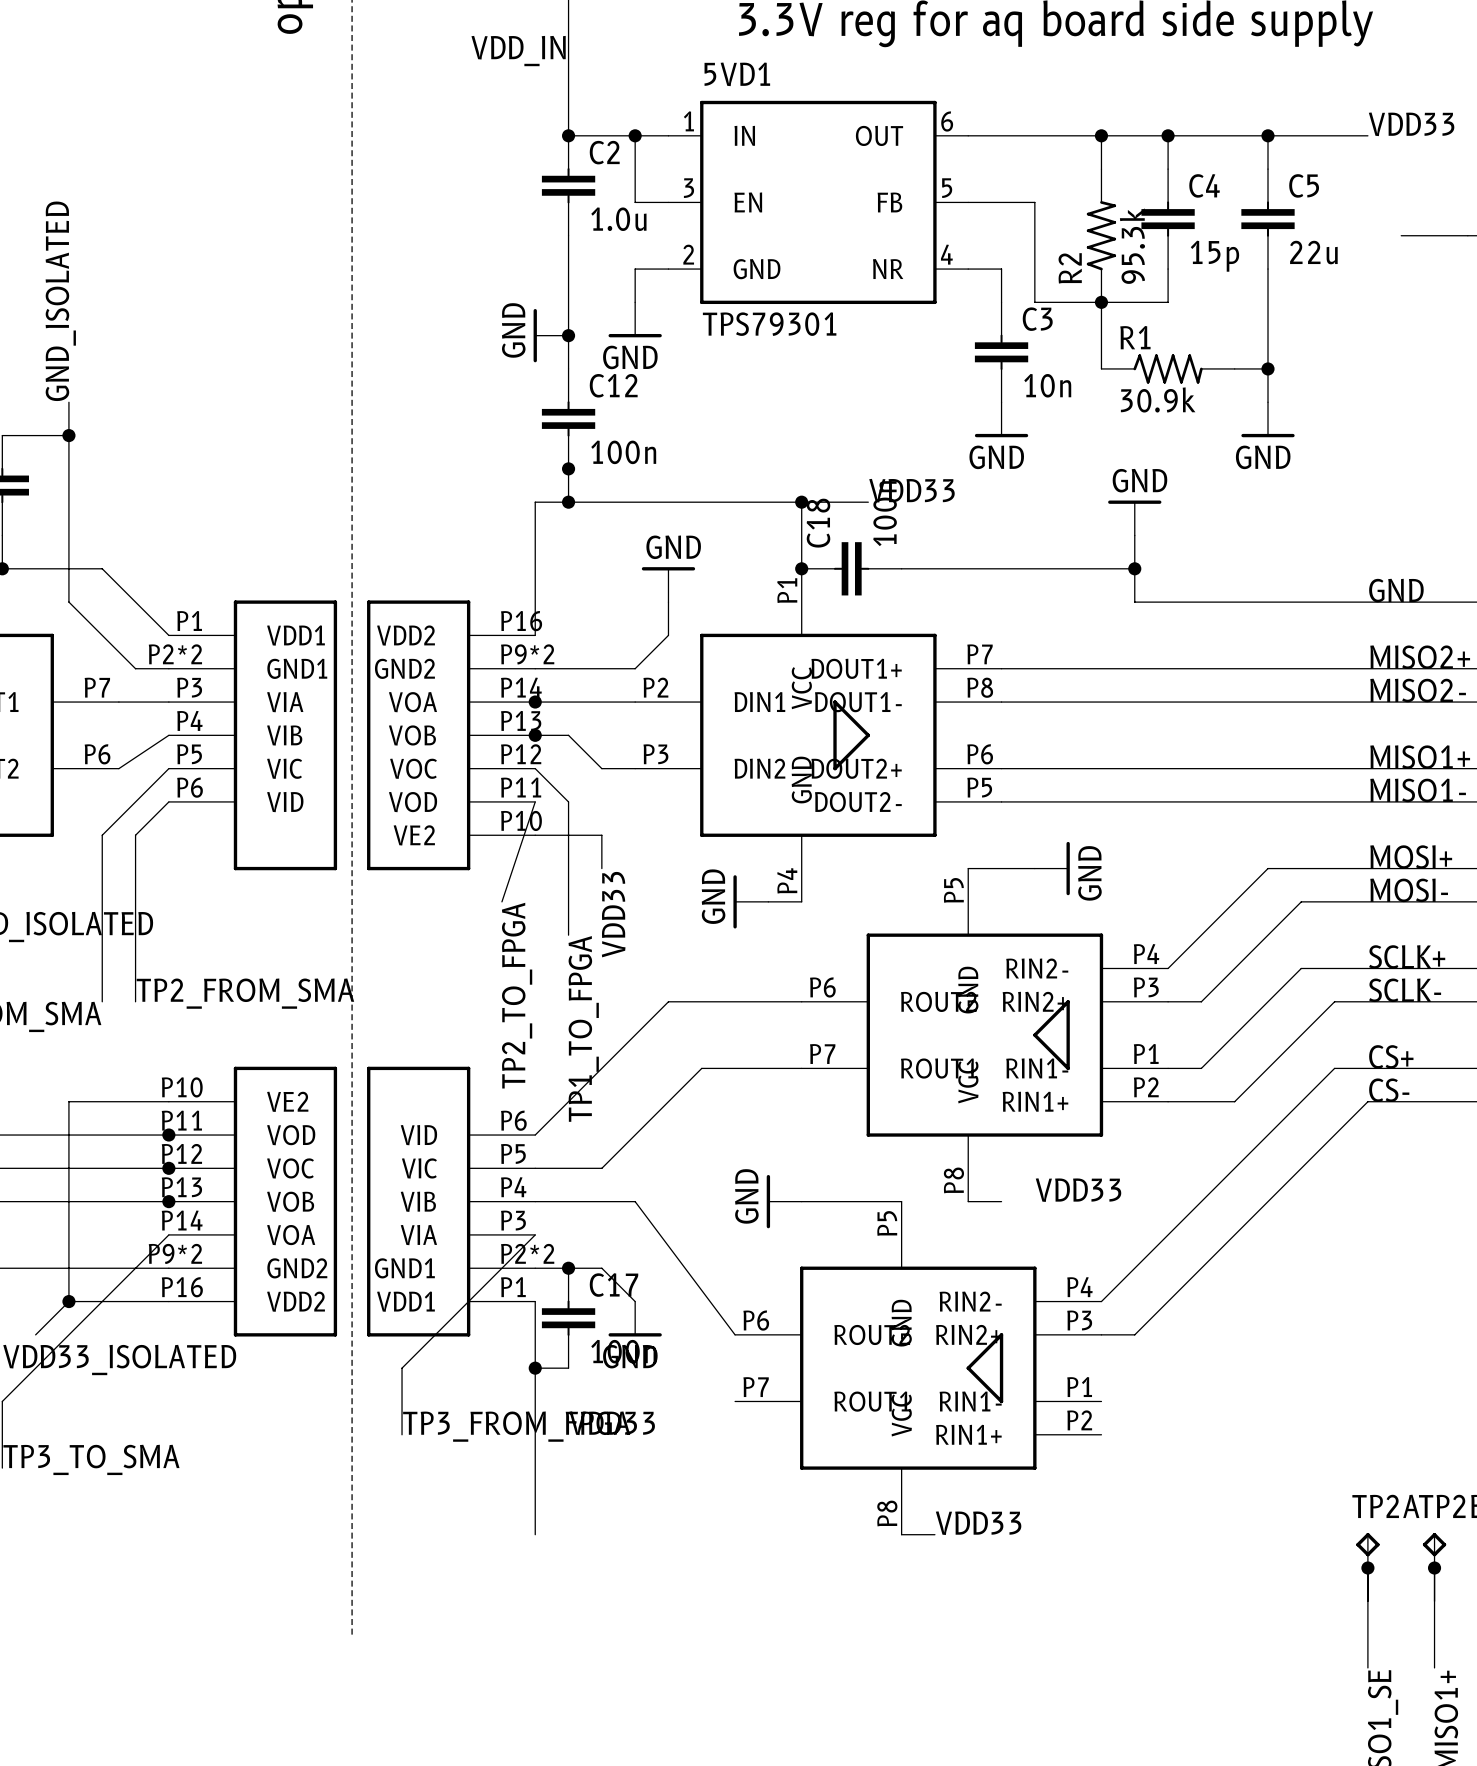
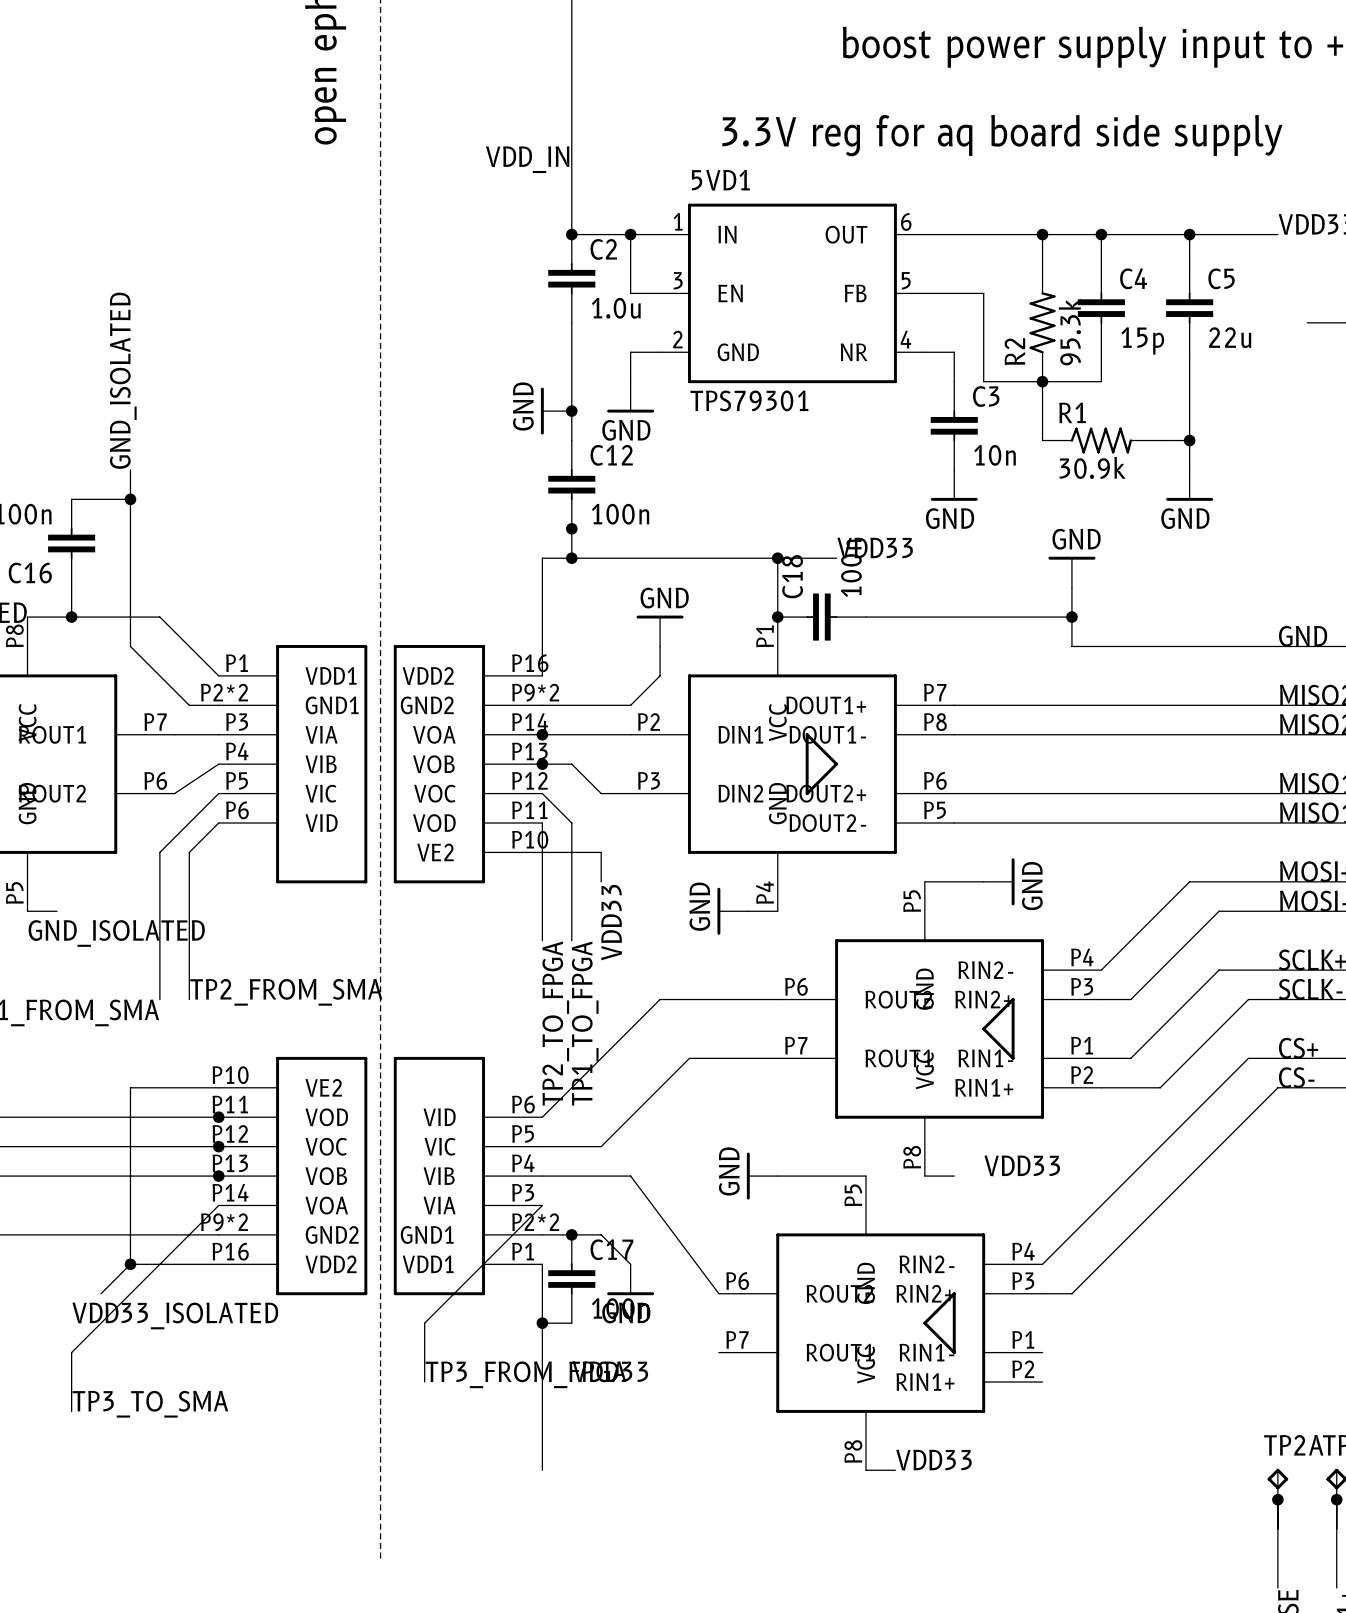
wire: (535, 801) (501, 901) -> (542, 823) (542, 940)
label position: TP2_TO_FPGA (517, 995) -> TP2_TO_FPGA (555, 1023)

